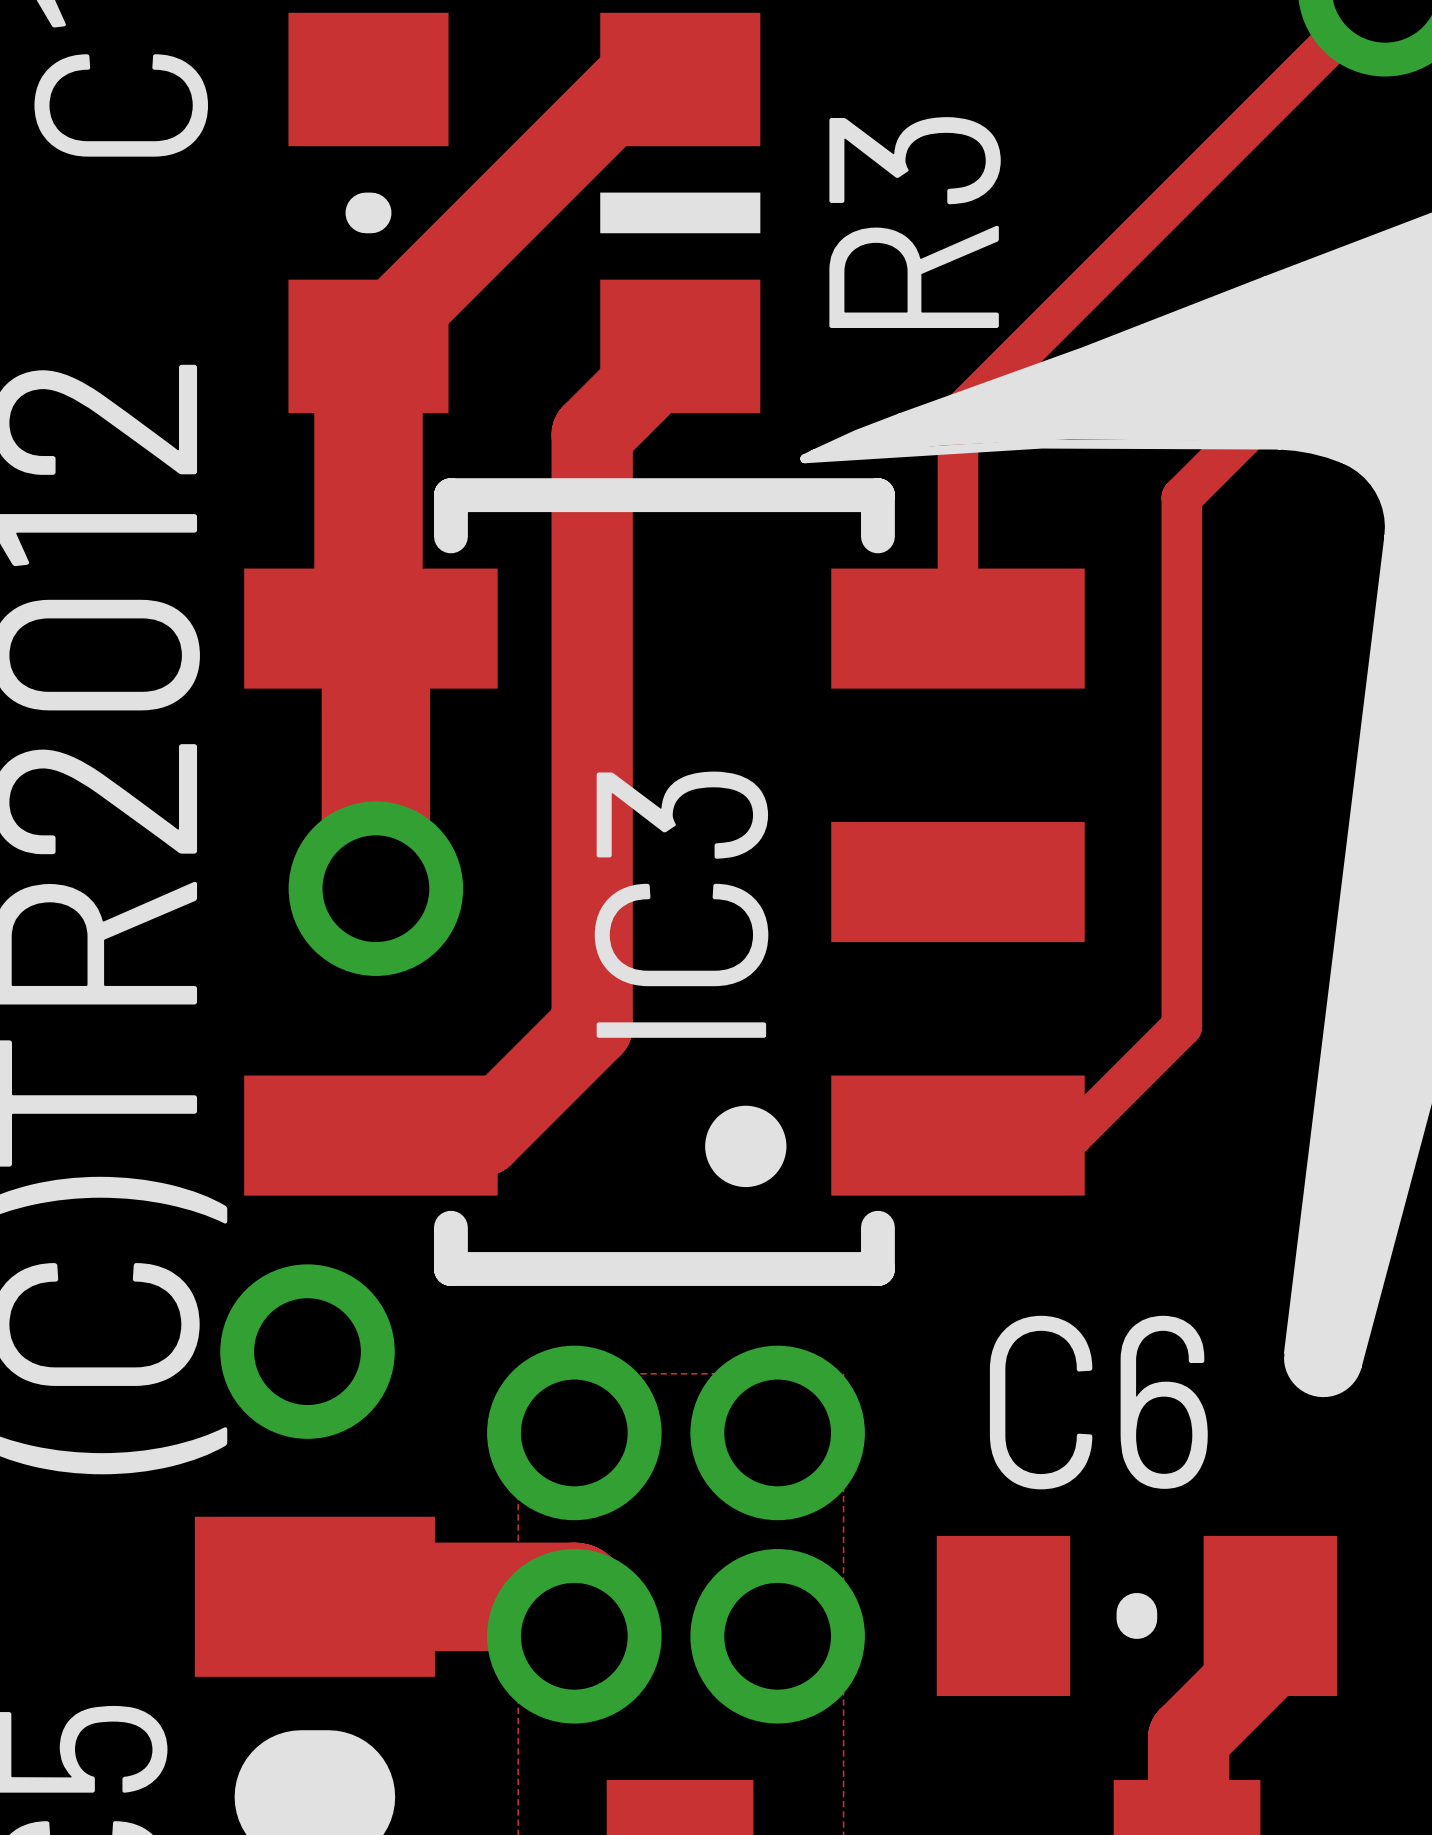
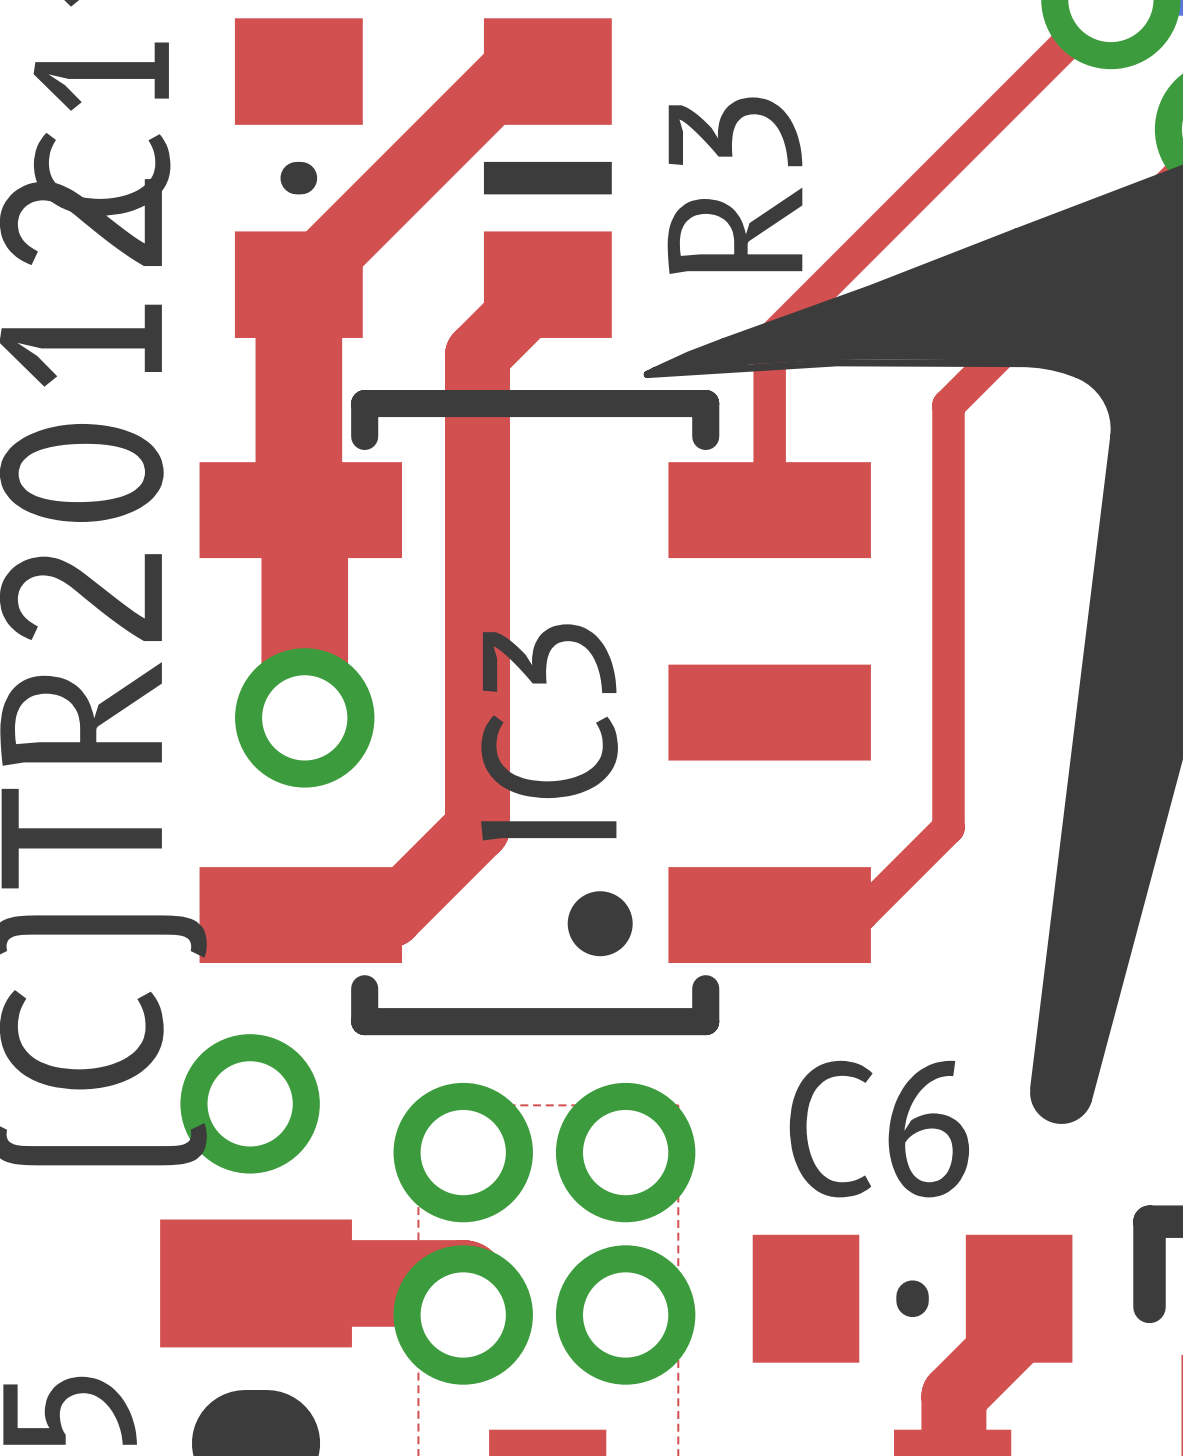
via position: (307, 1351) -> (250, 1103)

